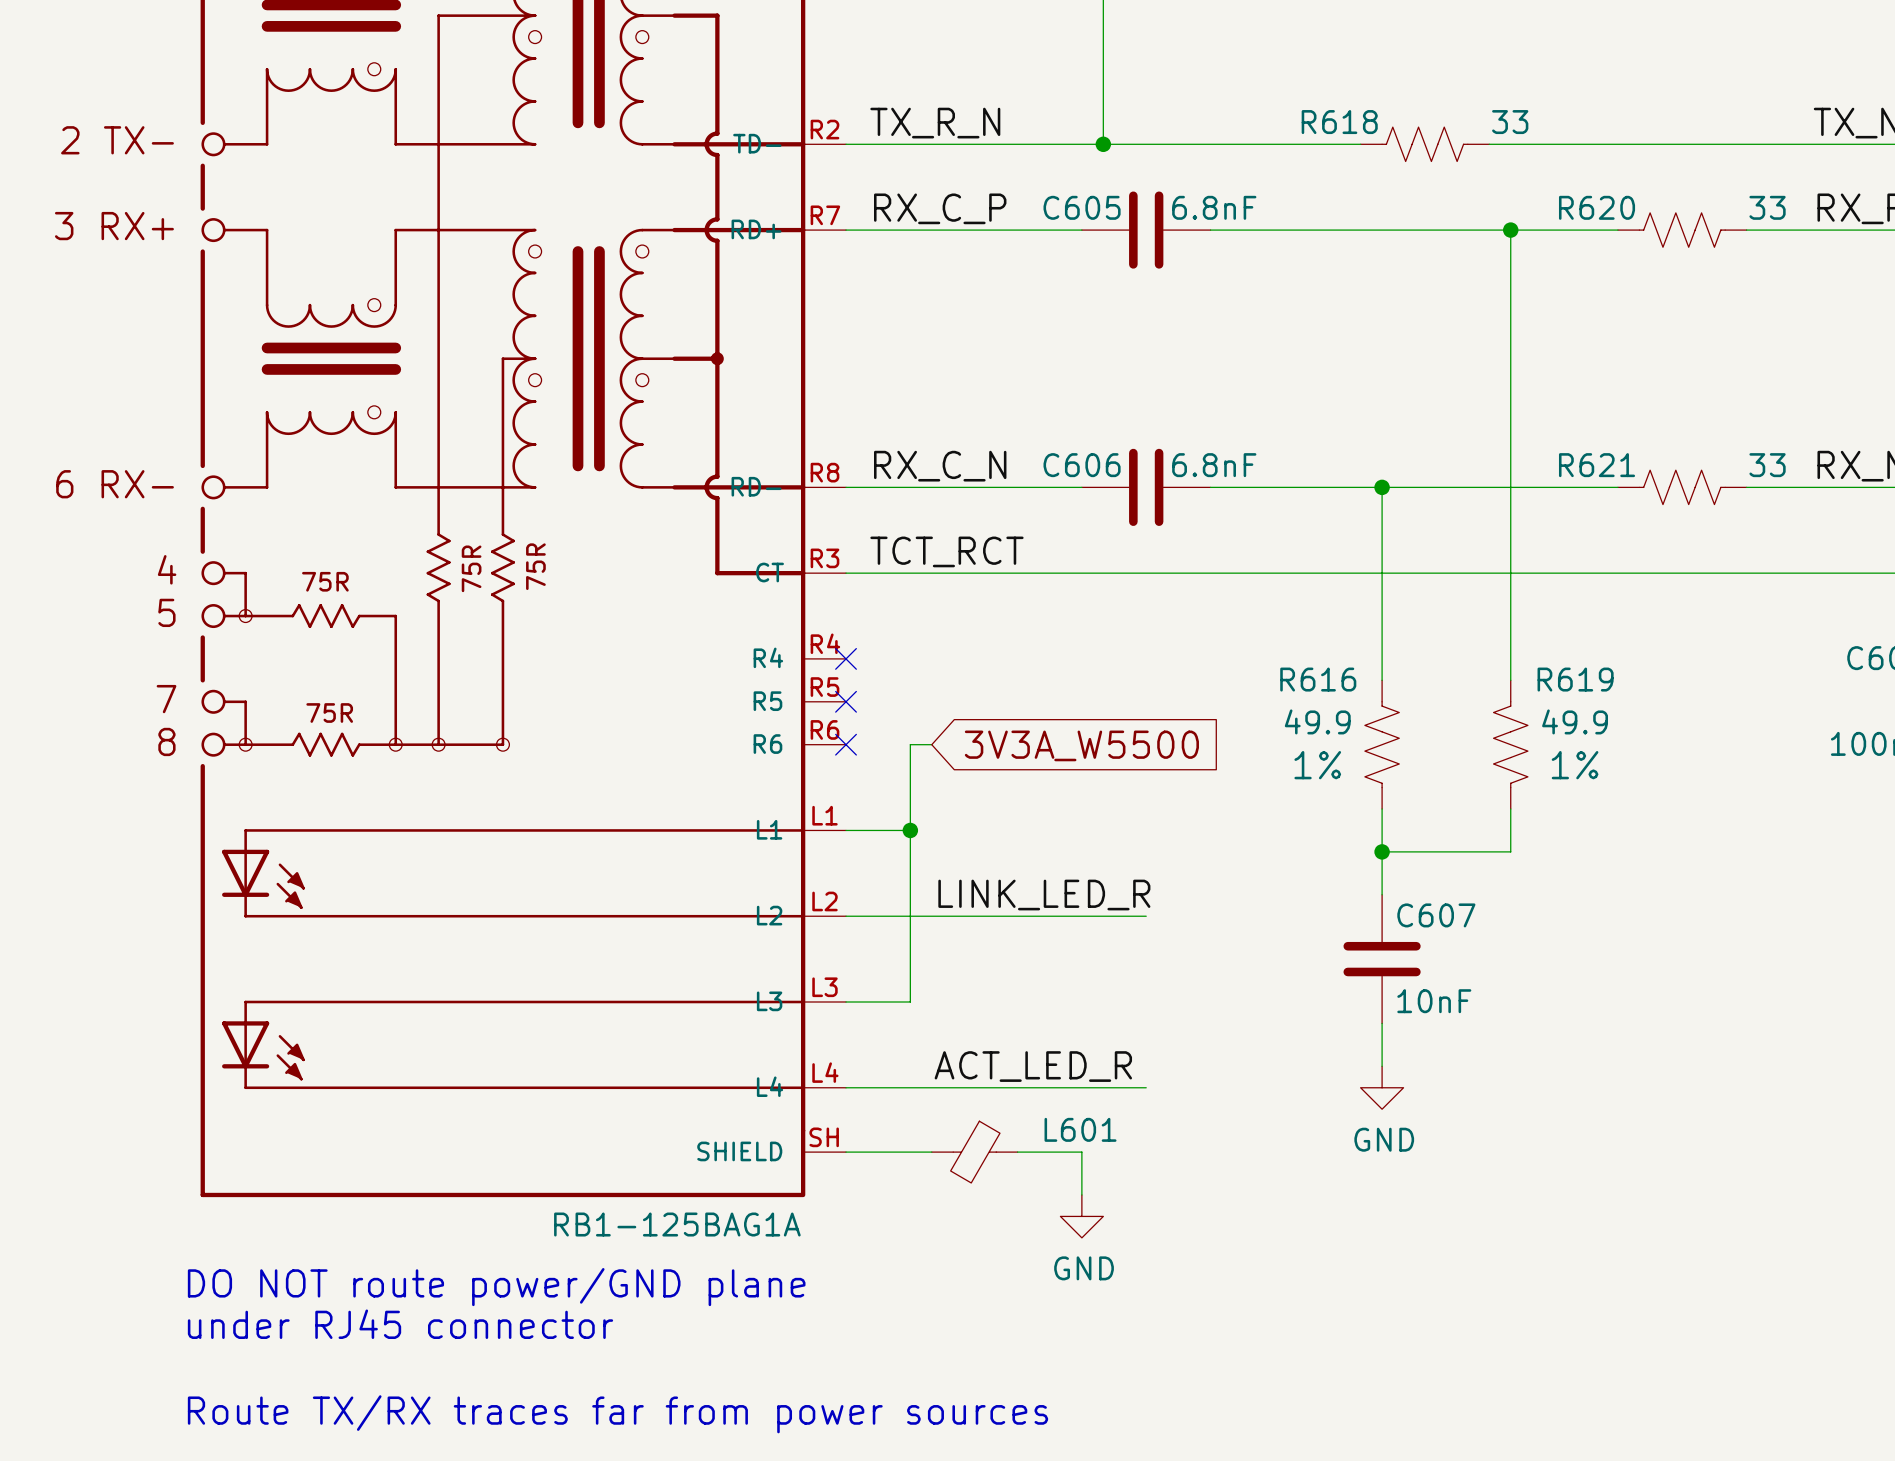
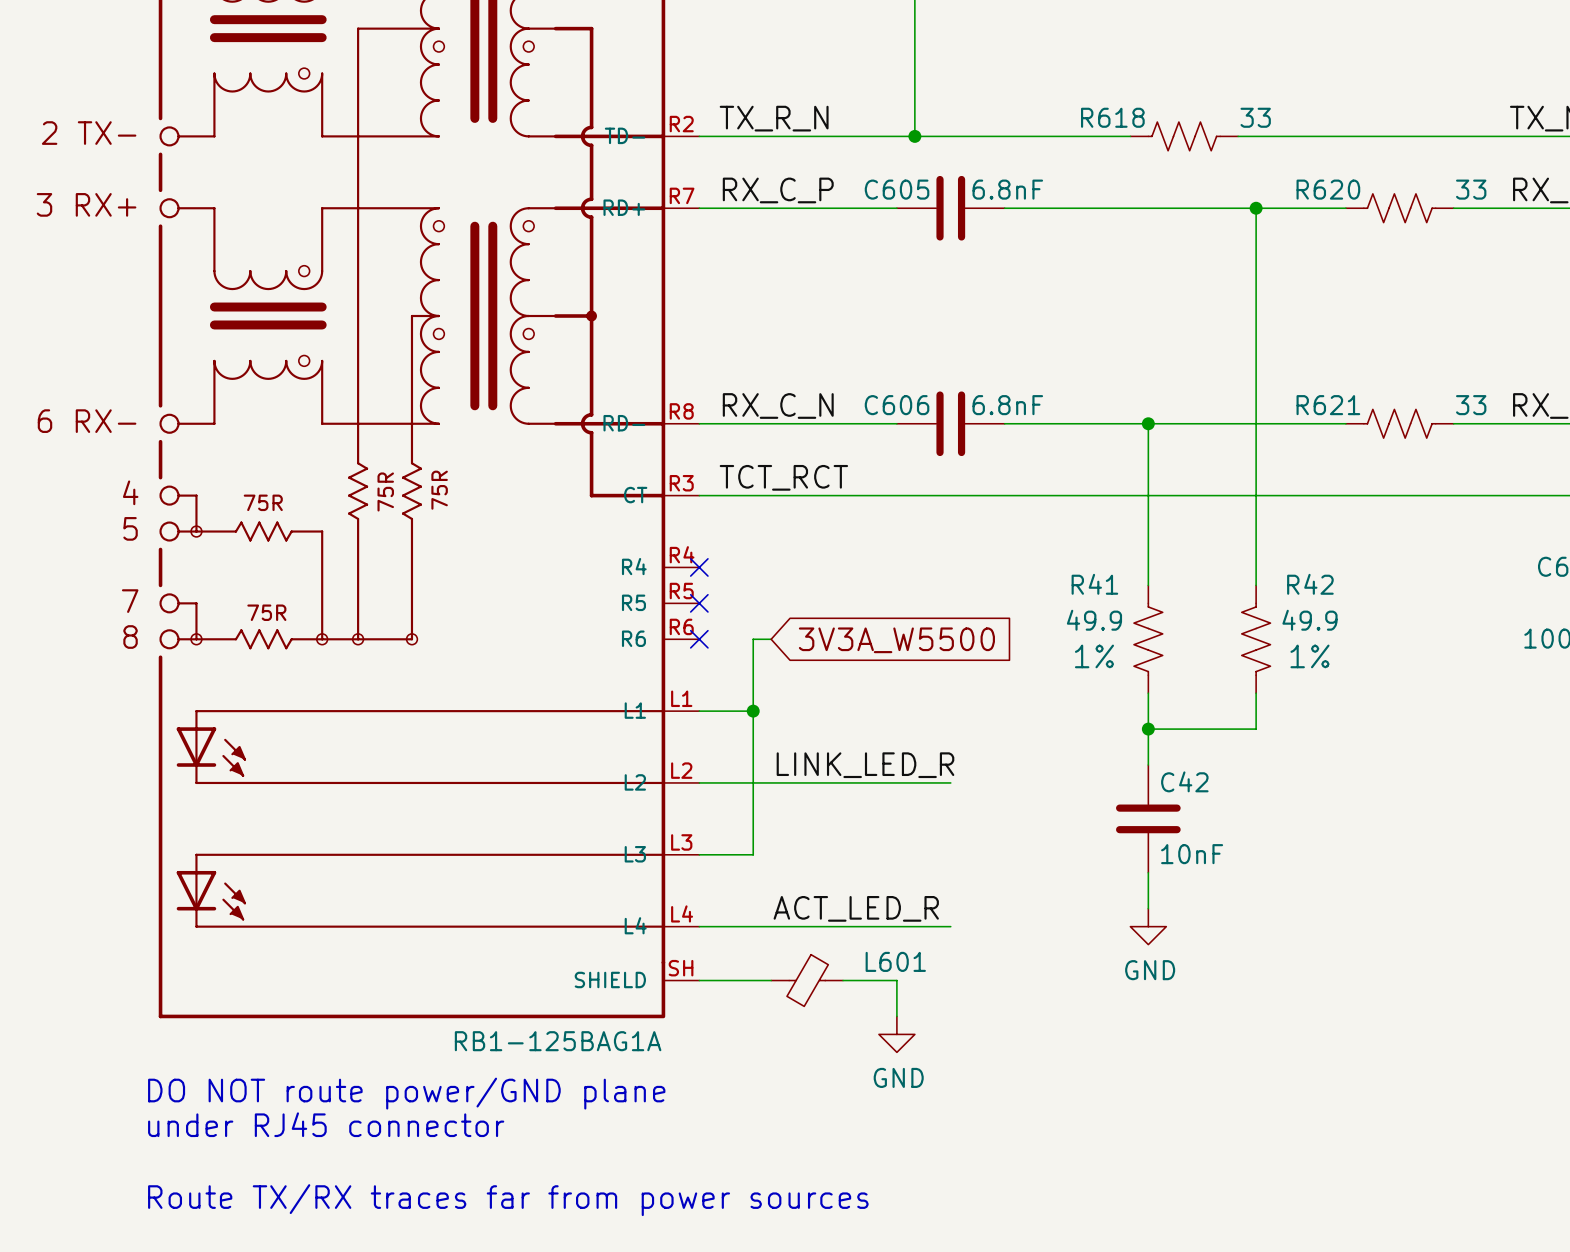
R616 name: R616 (1318, 679) -> R41 (1094, 584)
R619 name: R619 (1575, 679) -> R42 (1310, 584)
C607 name: C607 (1436, 915) -> C42 (1184, 781)

